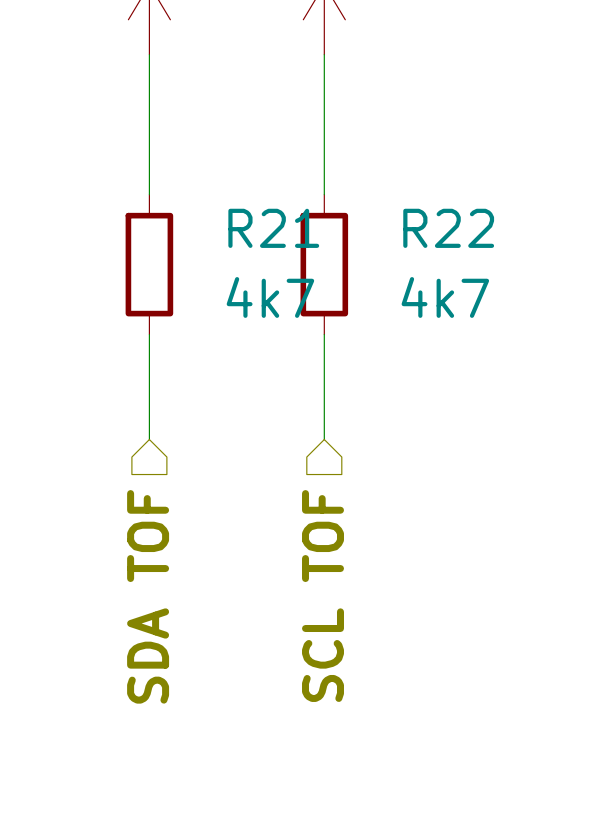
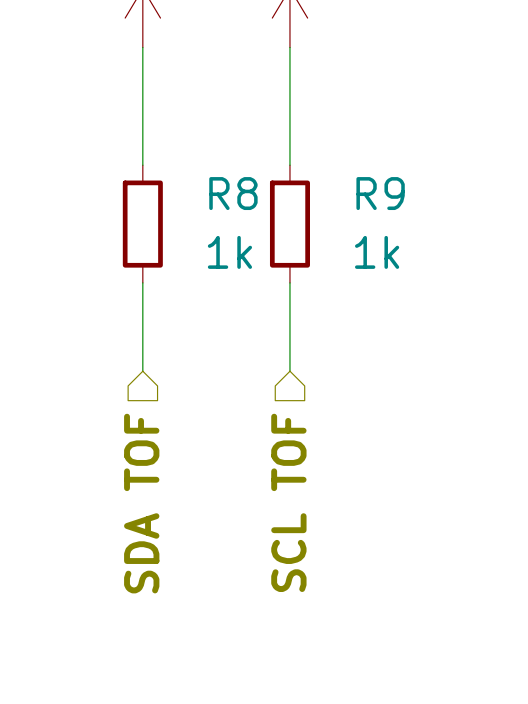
R21 name: R21 (273, 228) -> R8 (233, 193)
R22 name: R22 (448, 228) -> R9 (380, 193)
R21 value: 4k7 (270, 297) -> 1k (229, 252)
R22 value: 4k7 (445, 297) -> 1k (377, 252)

